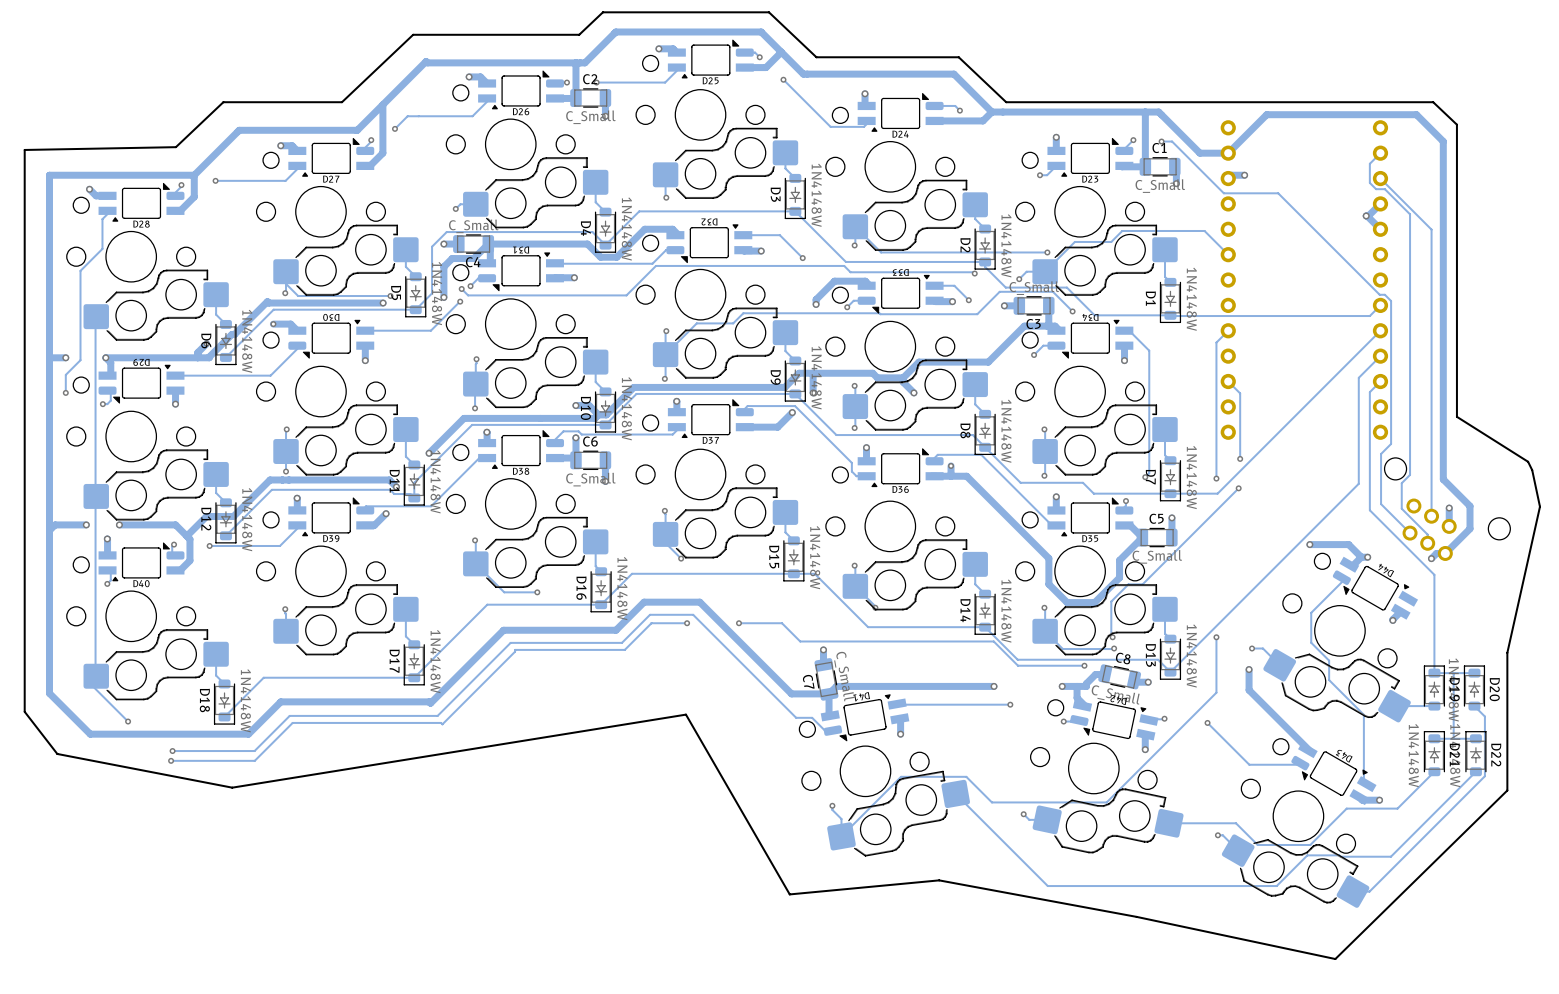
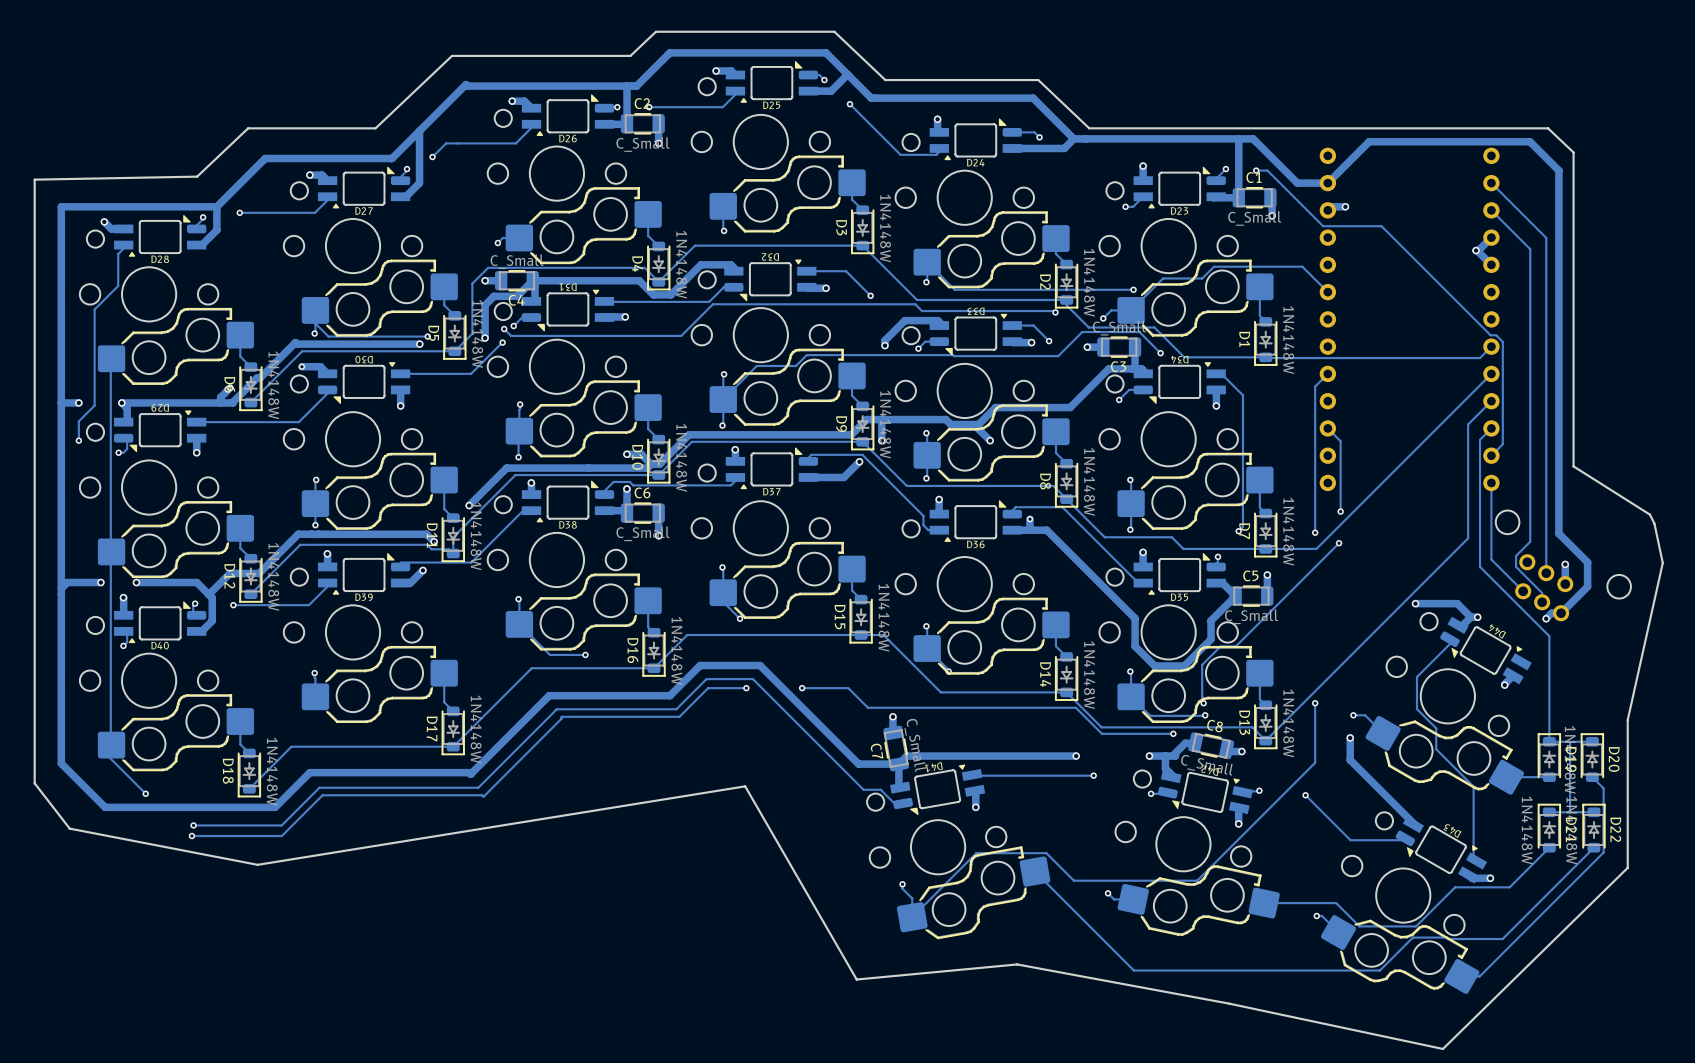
track: (1380, 153) (1369, 163) (1369, 182) (1376, 189) (1384, 189) (1410, 214) (1410, 474) (1401, 483) (1401, 508) (1403, 510) -> (1530, 249) (1530, 541) (1516, 555) (1516, 566)
track: (1416, 214) (1431, 229) -> (1491, 183) (1546, 237) (1546, 265)
track: (1391, 396) (1391, 443) (1381, 453) (1381, 504) -> (1491, 482) (1492, 560)
track: none -> (1502, 444) (1491, 455)

